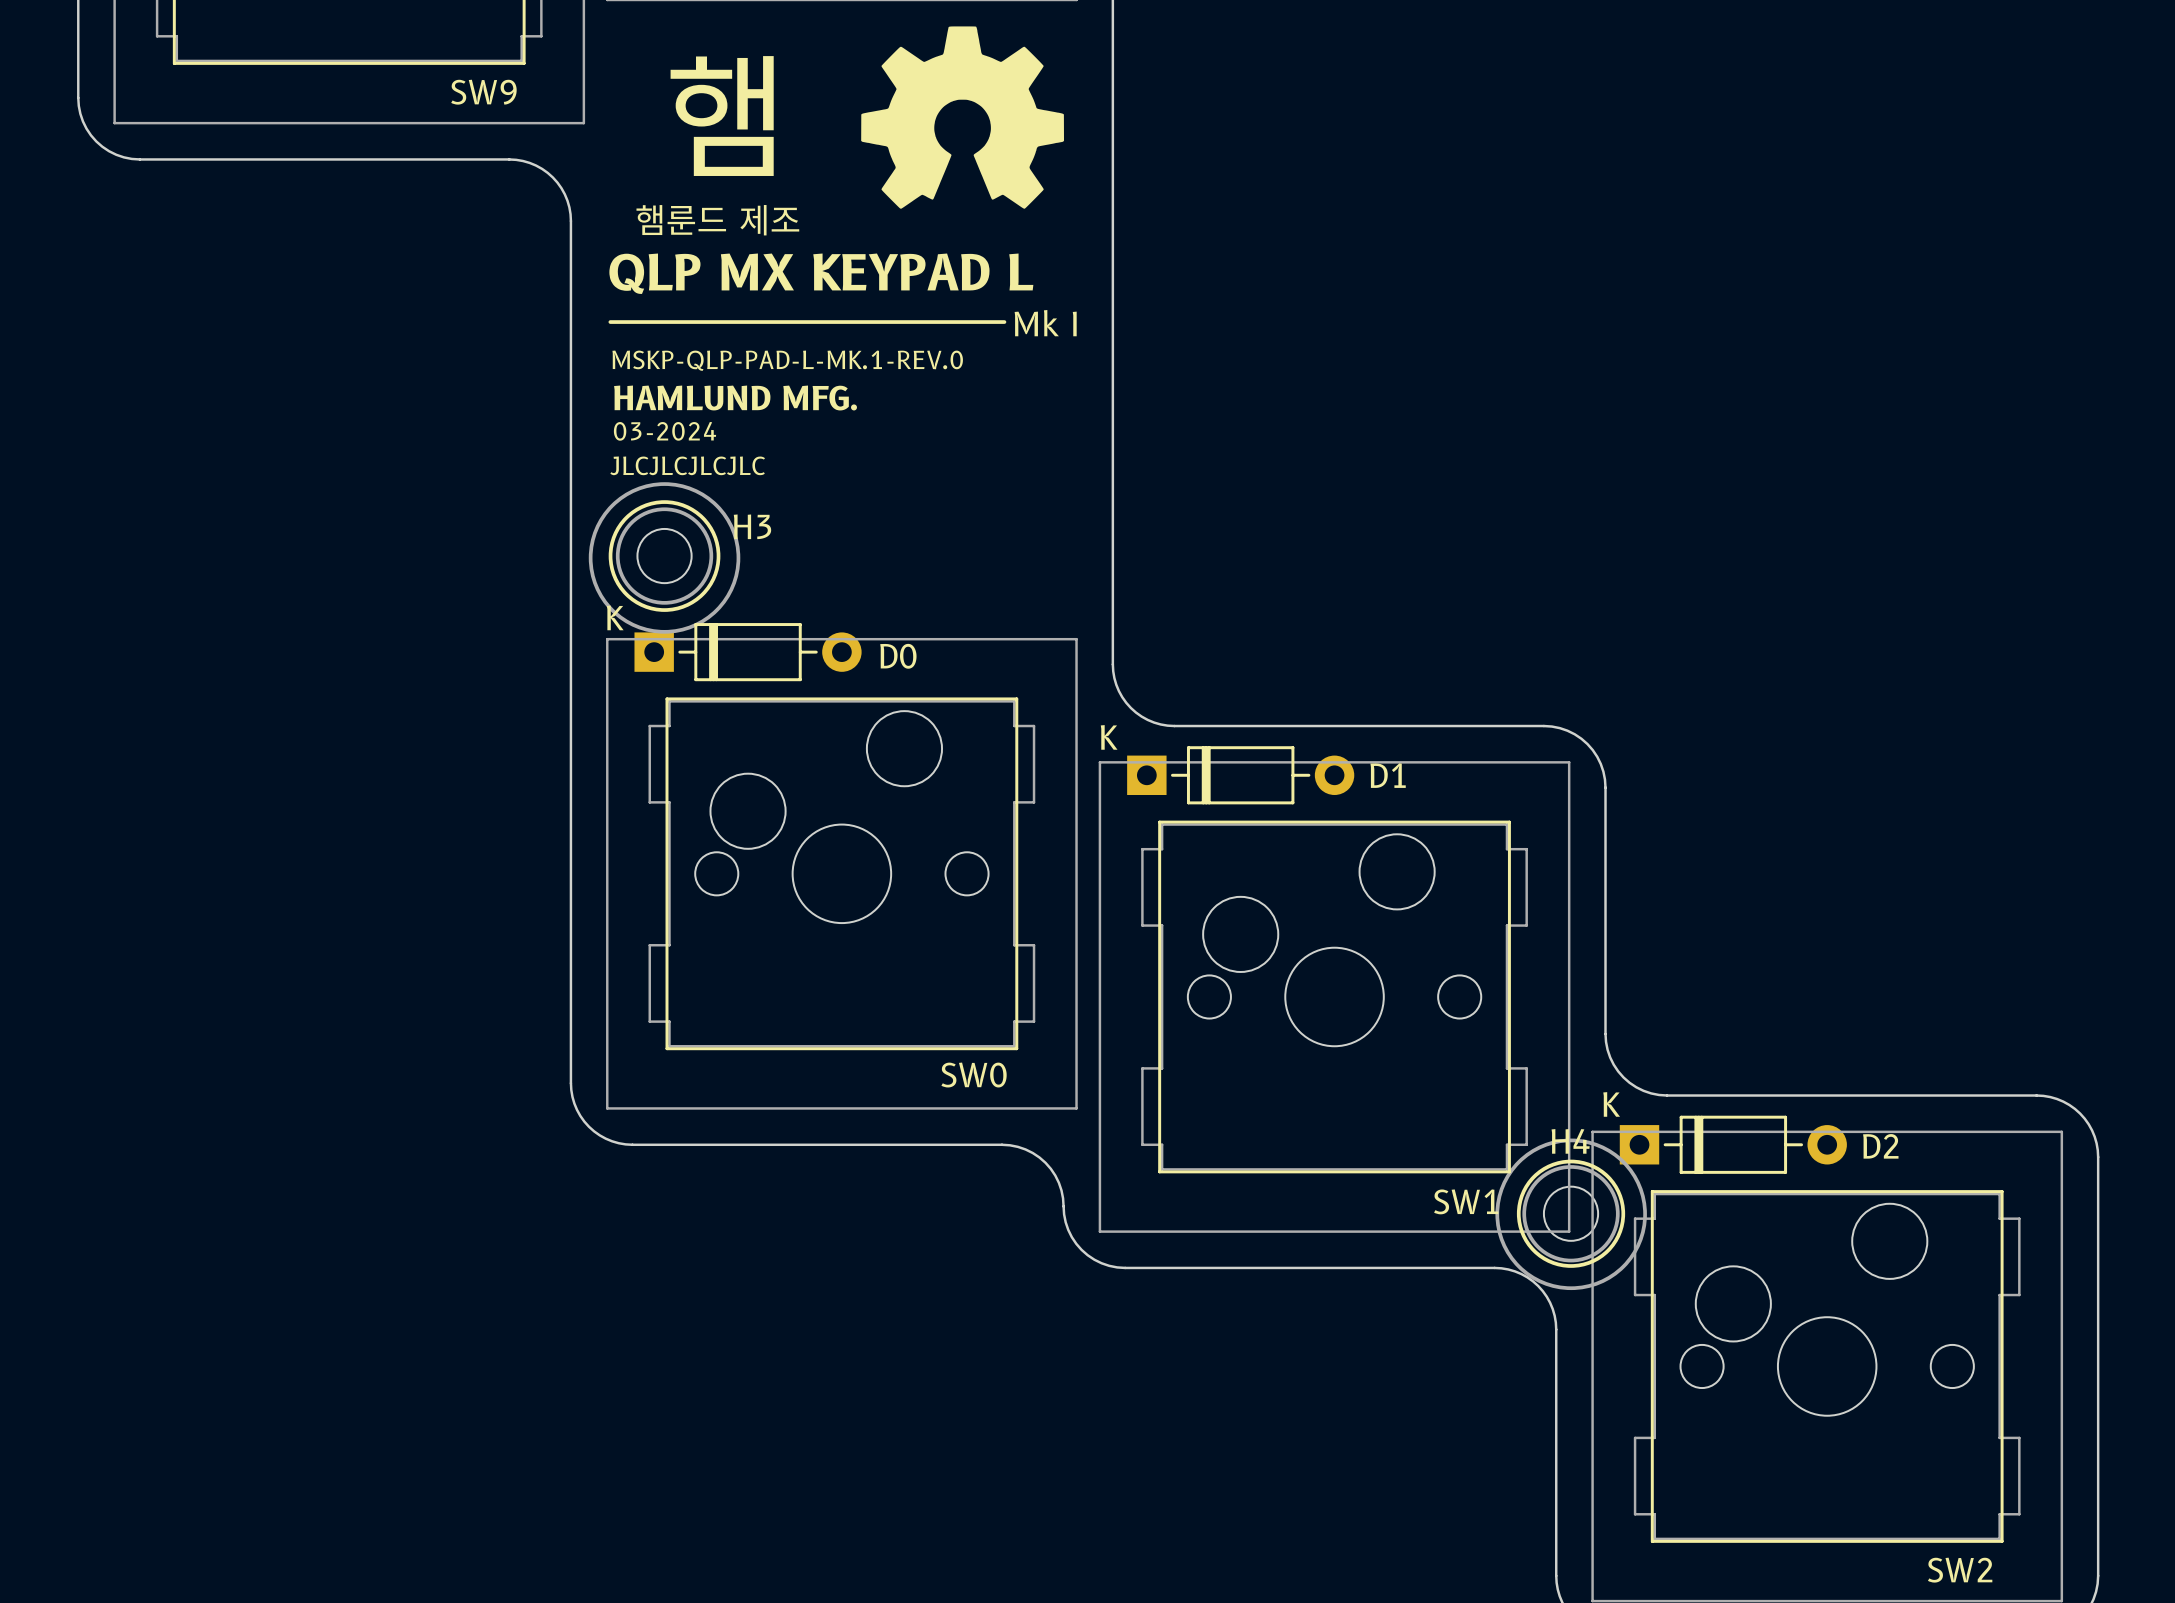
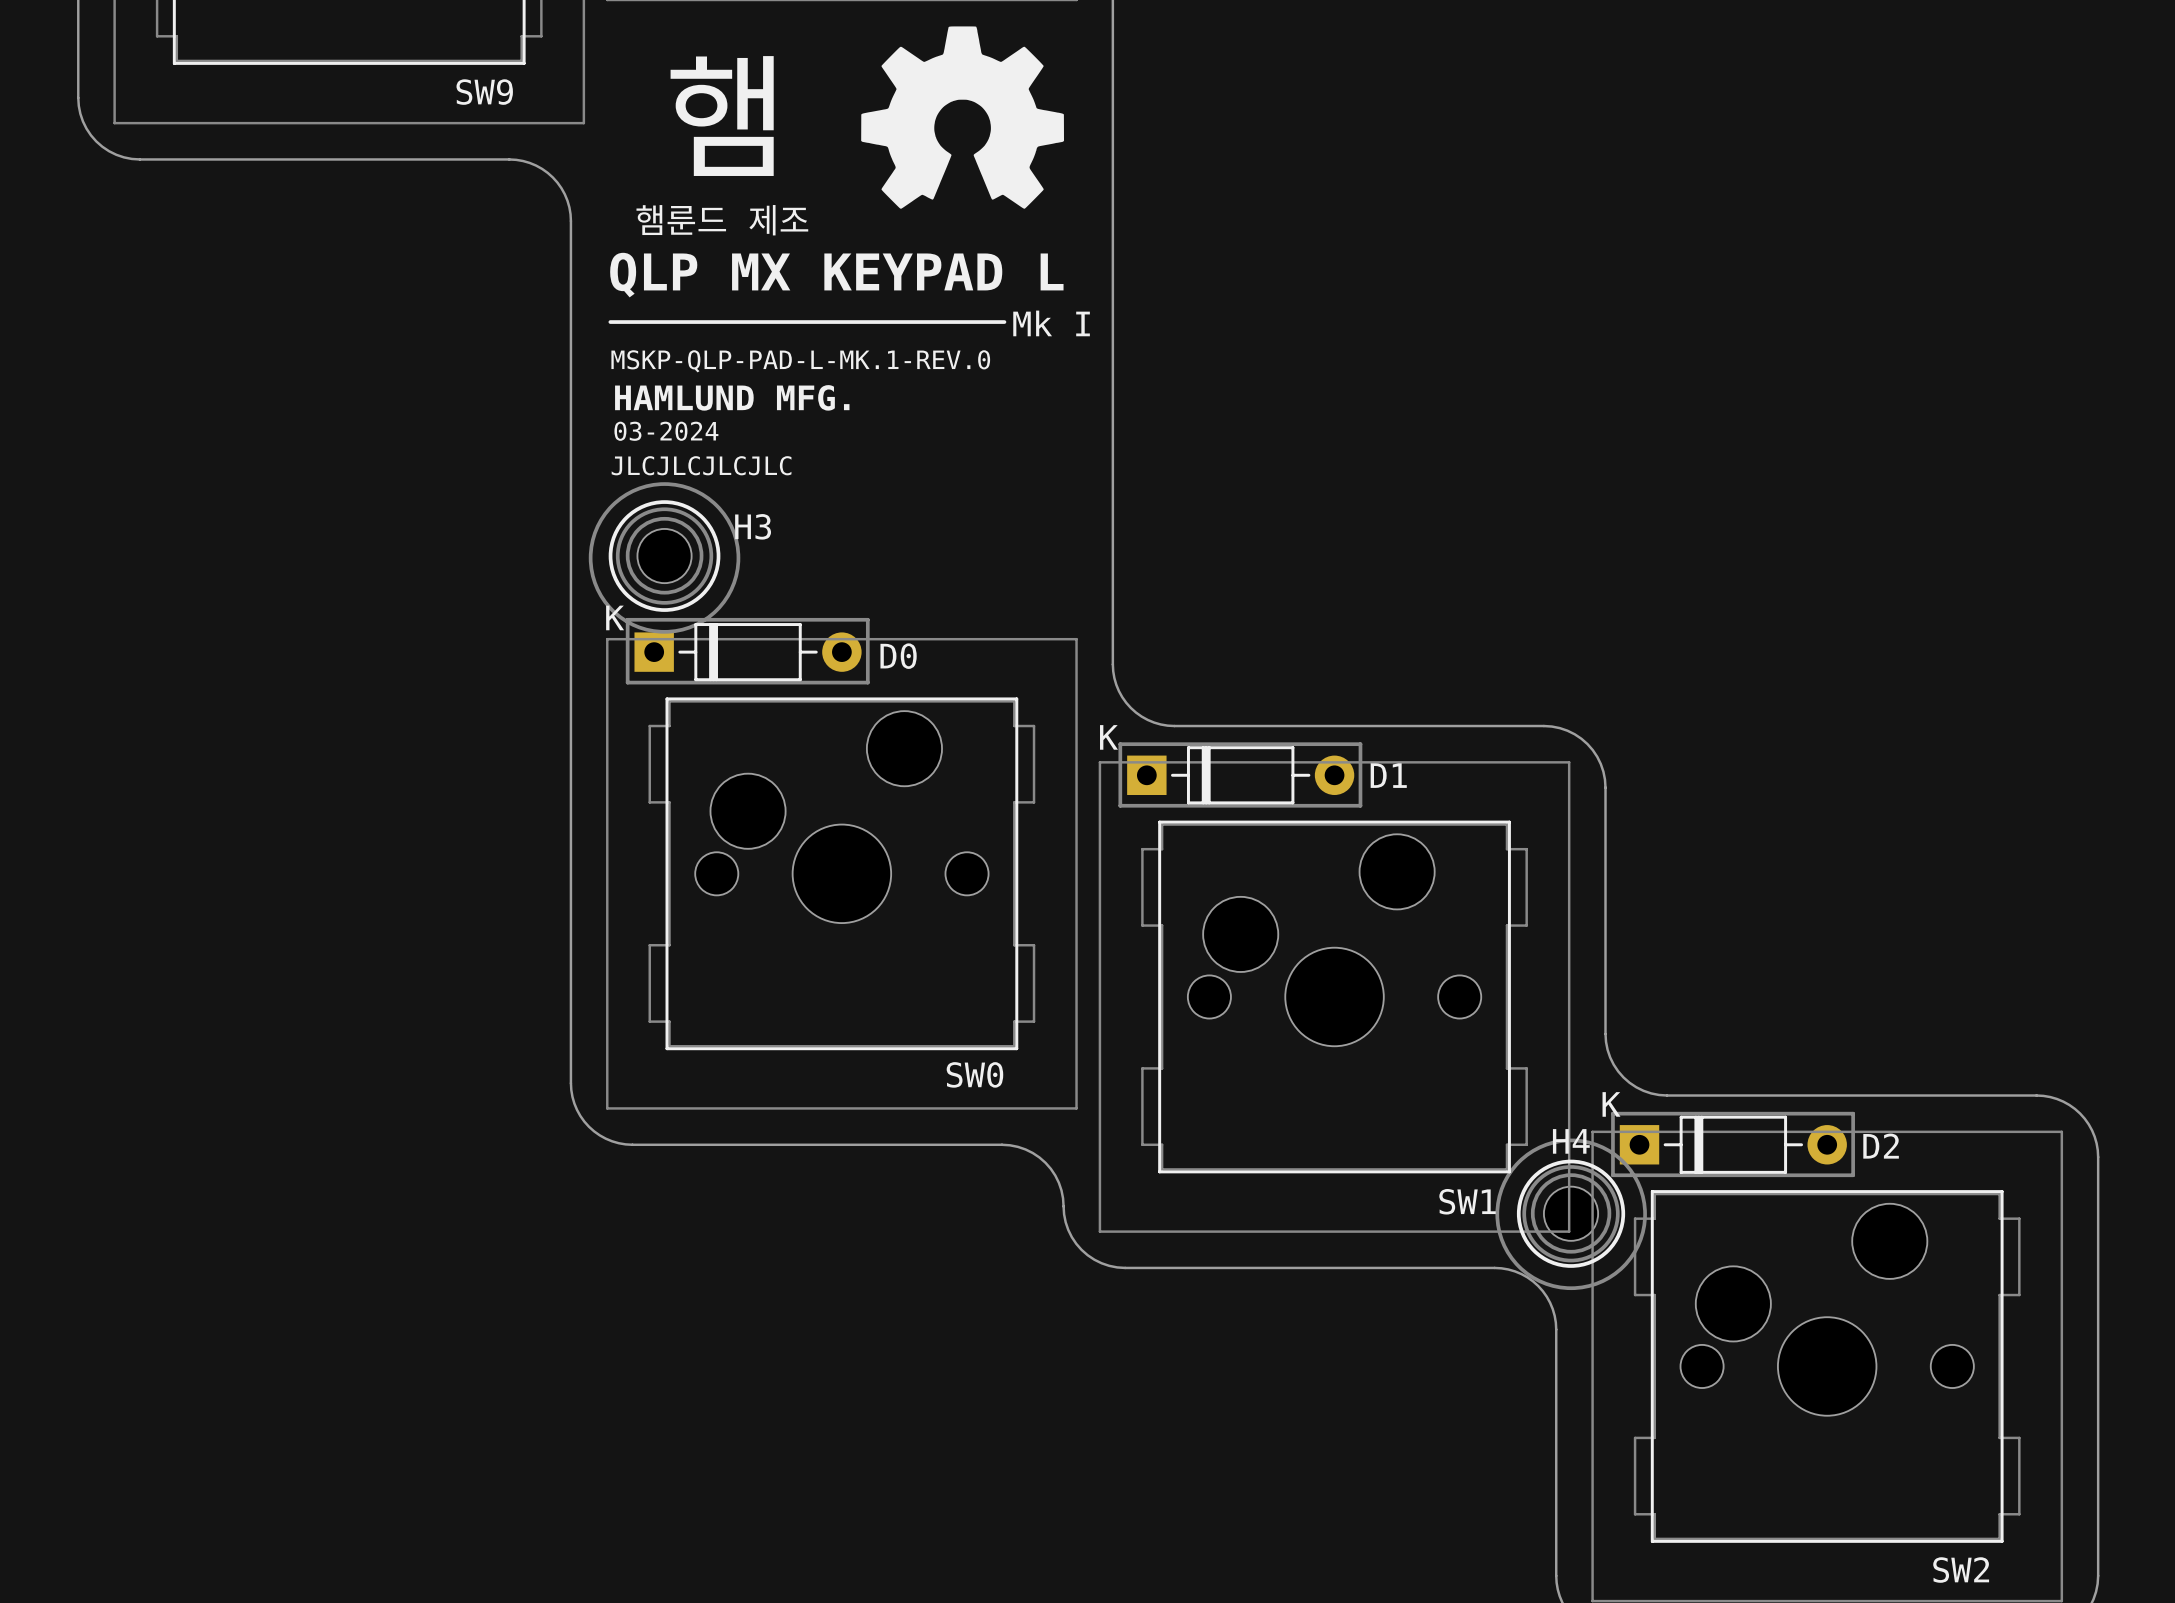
drawing: none -> [625, 516, 704, 595]
line: none -> (627, 619) (867, 619) (867, 682) (627, 682) (627, 619)
line: none -> (1120, 744) (1360, 744) (1360, 805) (1120, 805) (1120, 744)
line: none -> (1612, 1113) (1853, 1113) (1853, 1175) (1612, 1175) (1612, 1113)
drawing: none -> [1530, 1173, 1612, 1254]

